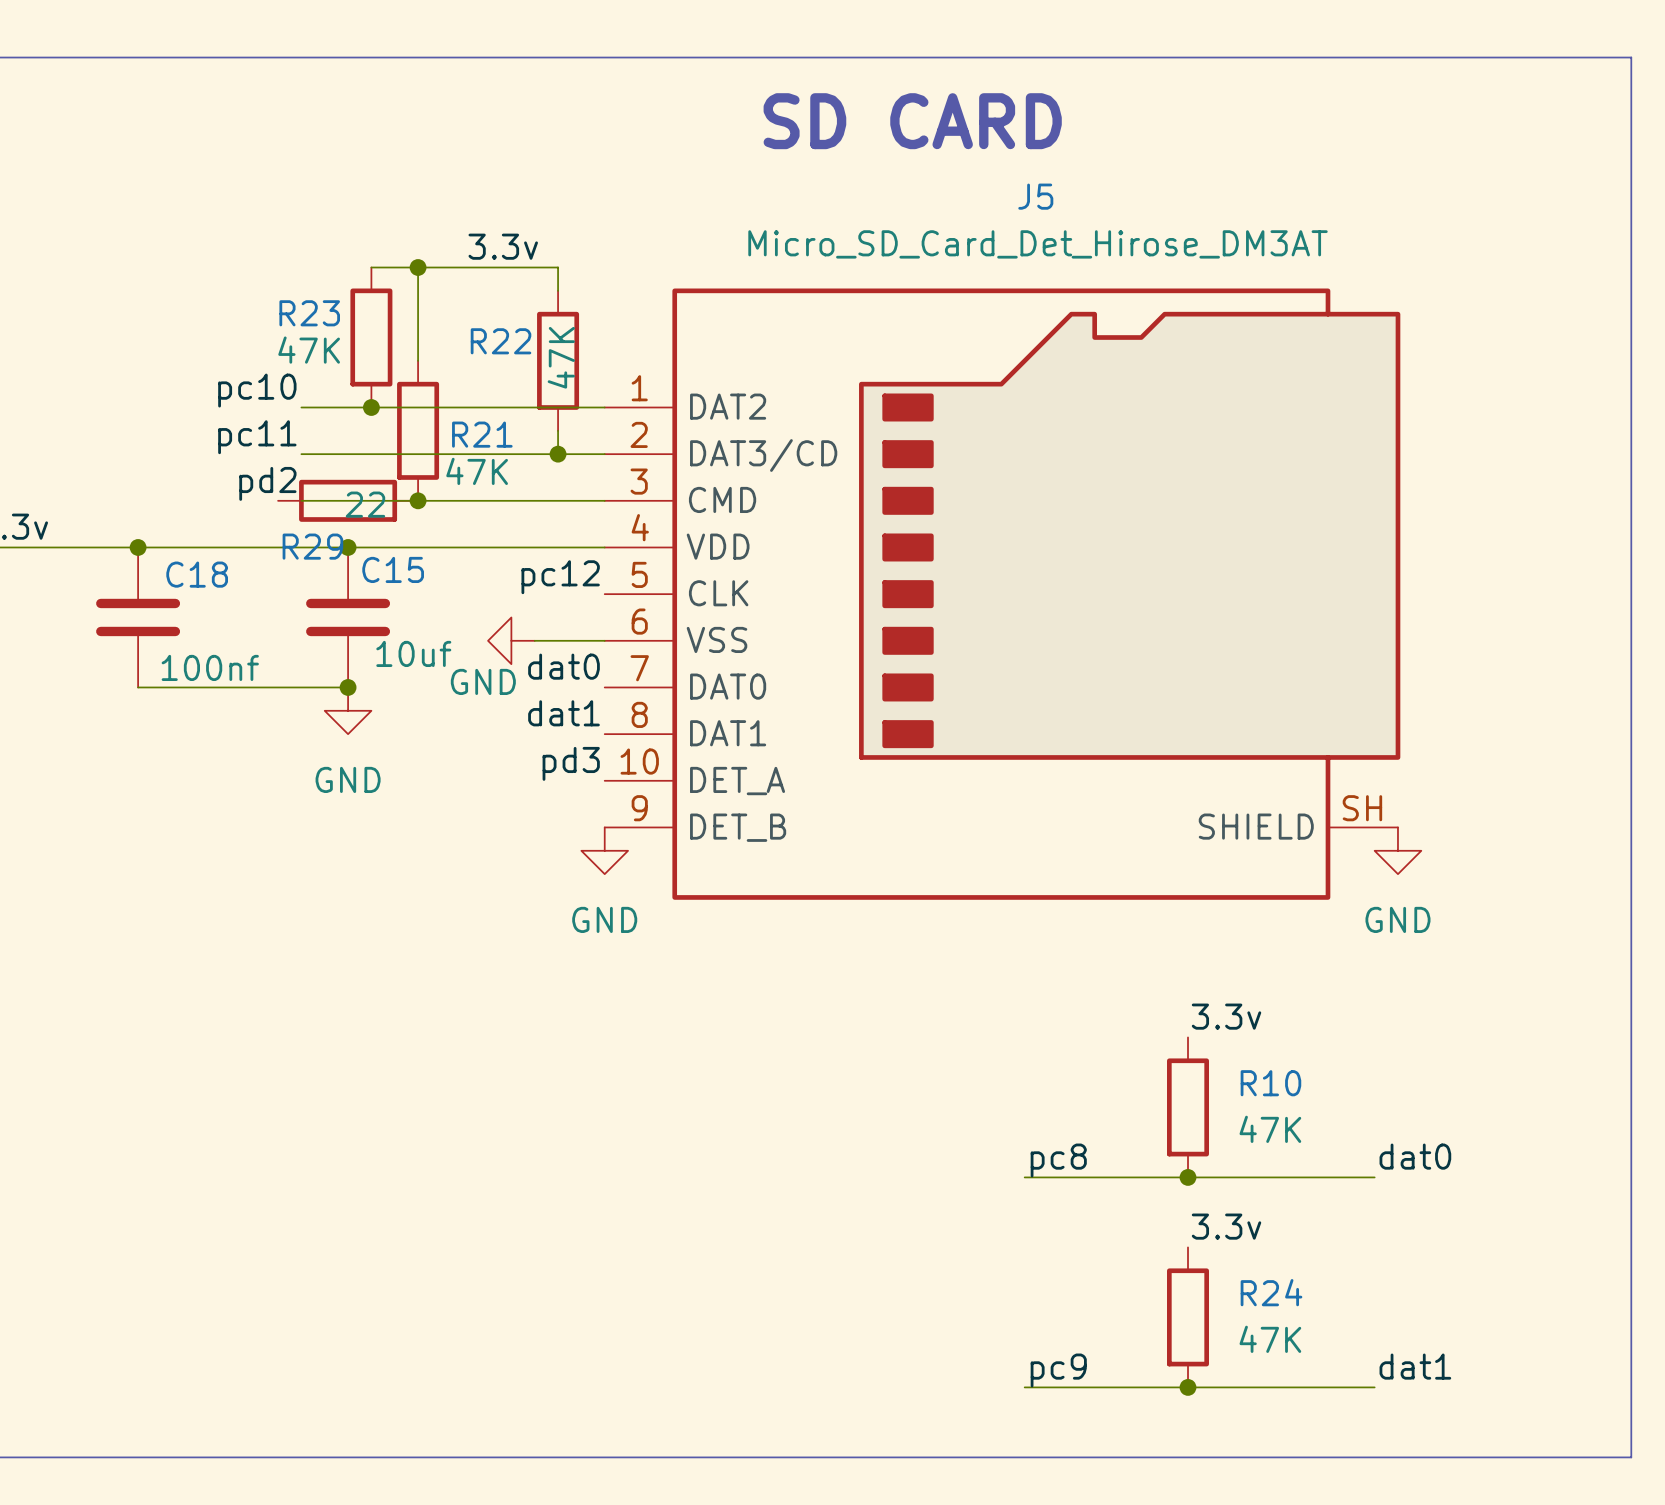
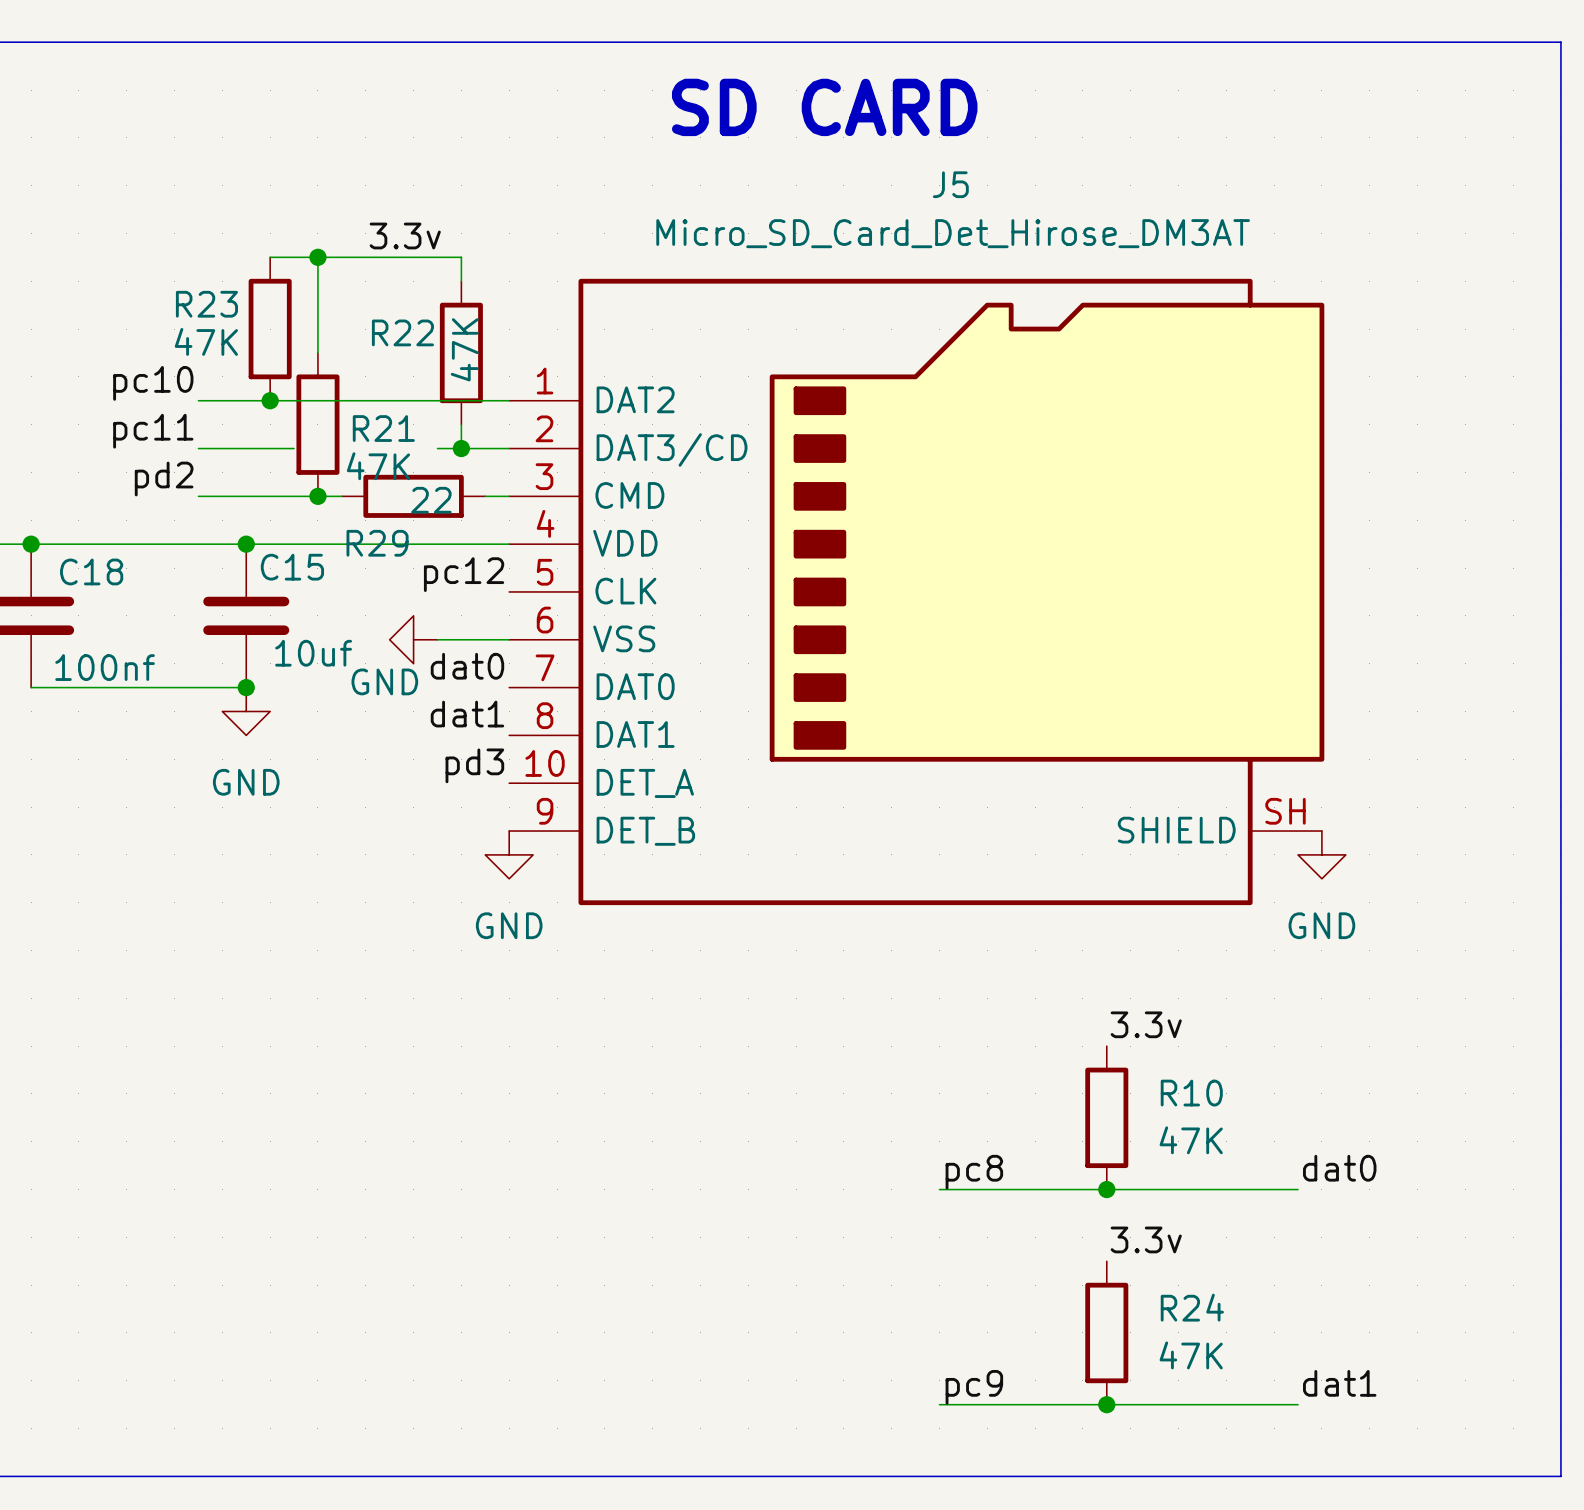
wire: (394, 454) (534, 454) -> none
R29 position: (348, 500) -> (413, 496)
wire: (441, 500) (581, 500) -> none

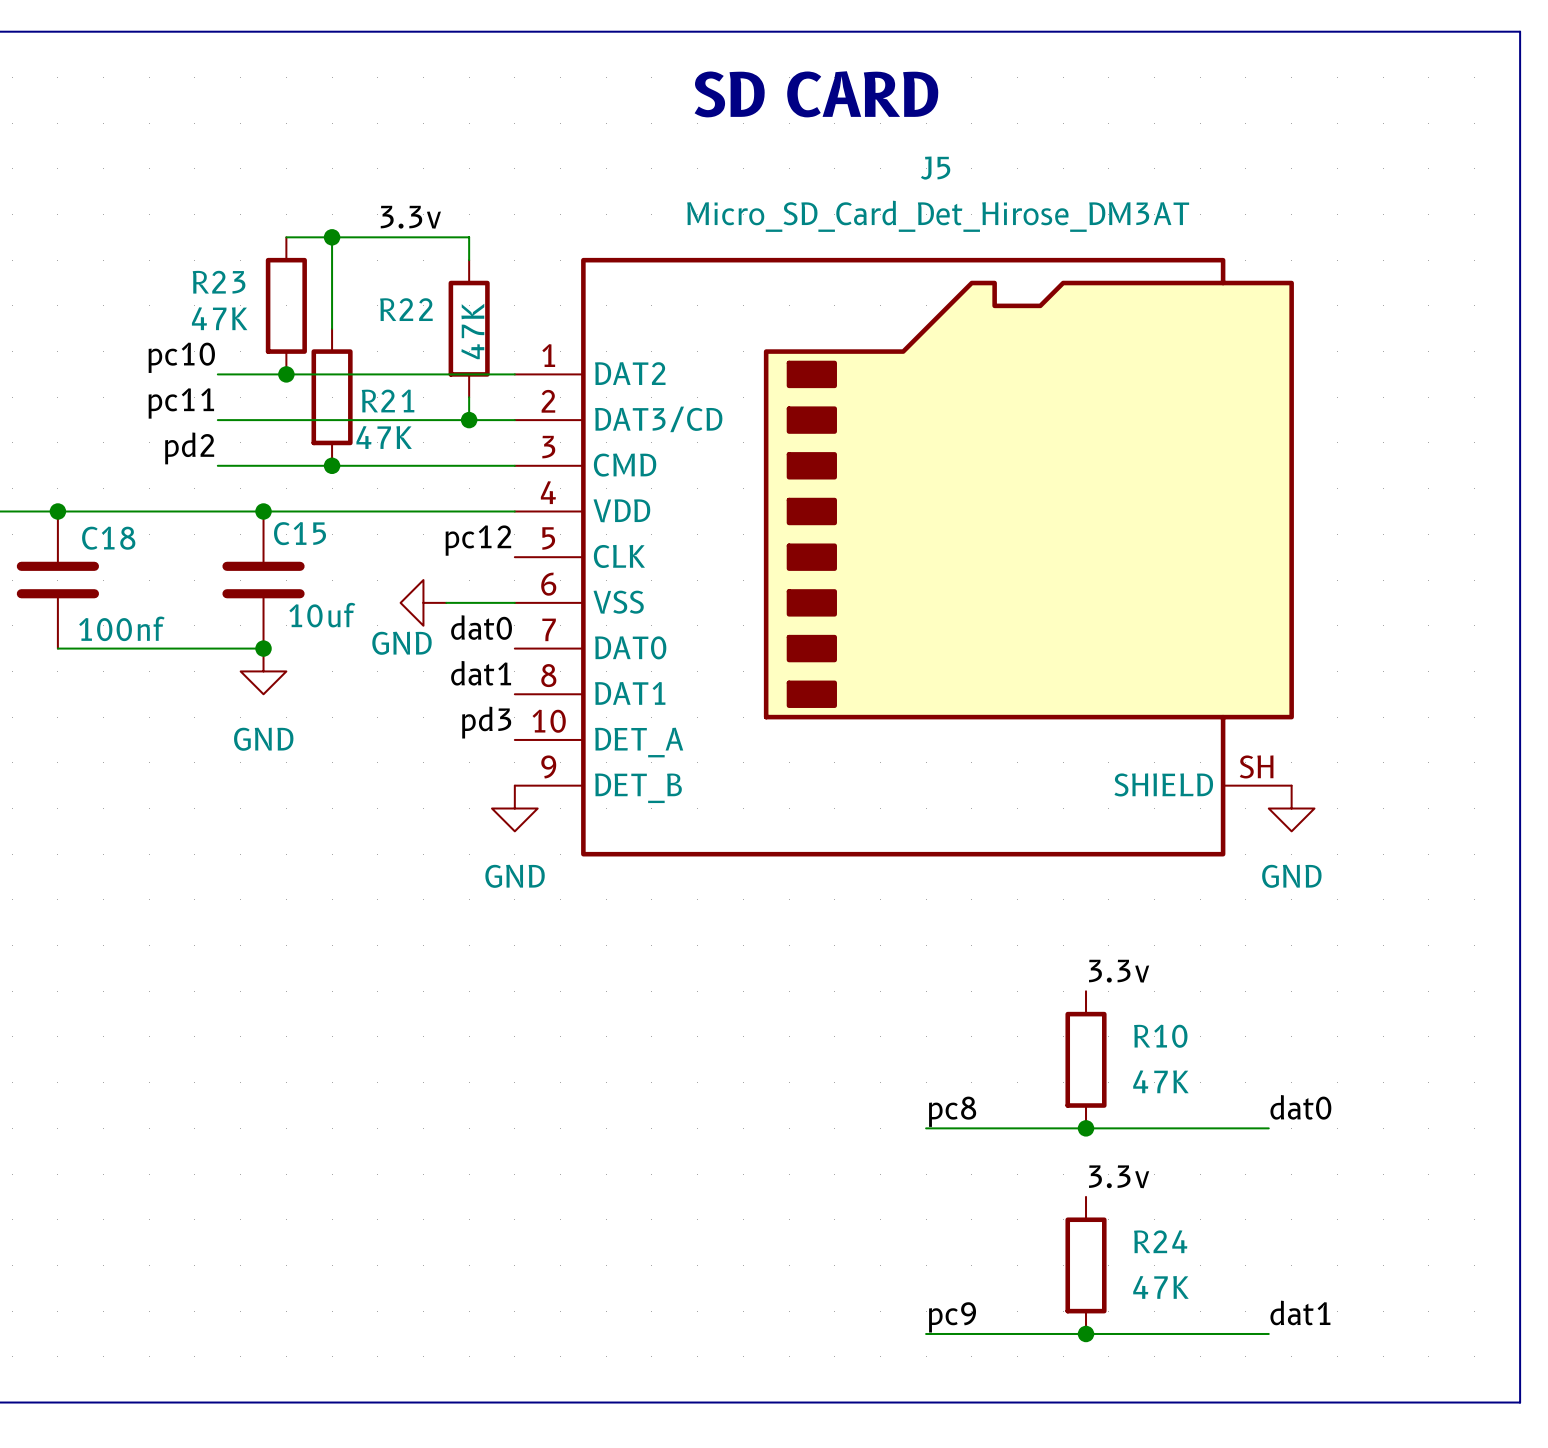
wire: none -> (309, 420) (446, 420)
wire: none -> (354, 465) (491, 465)
R29: 22 (413, 496) -> none

